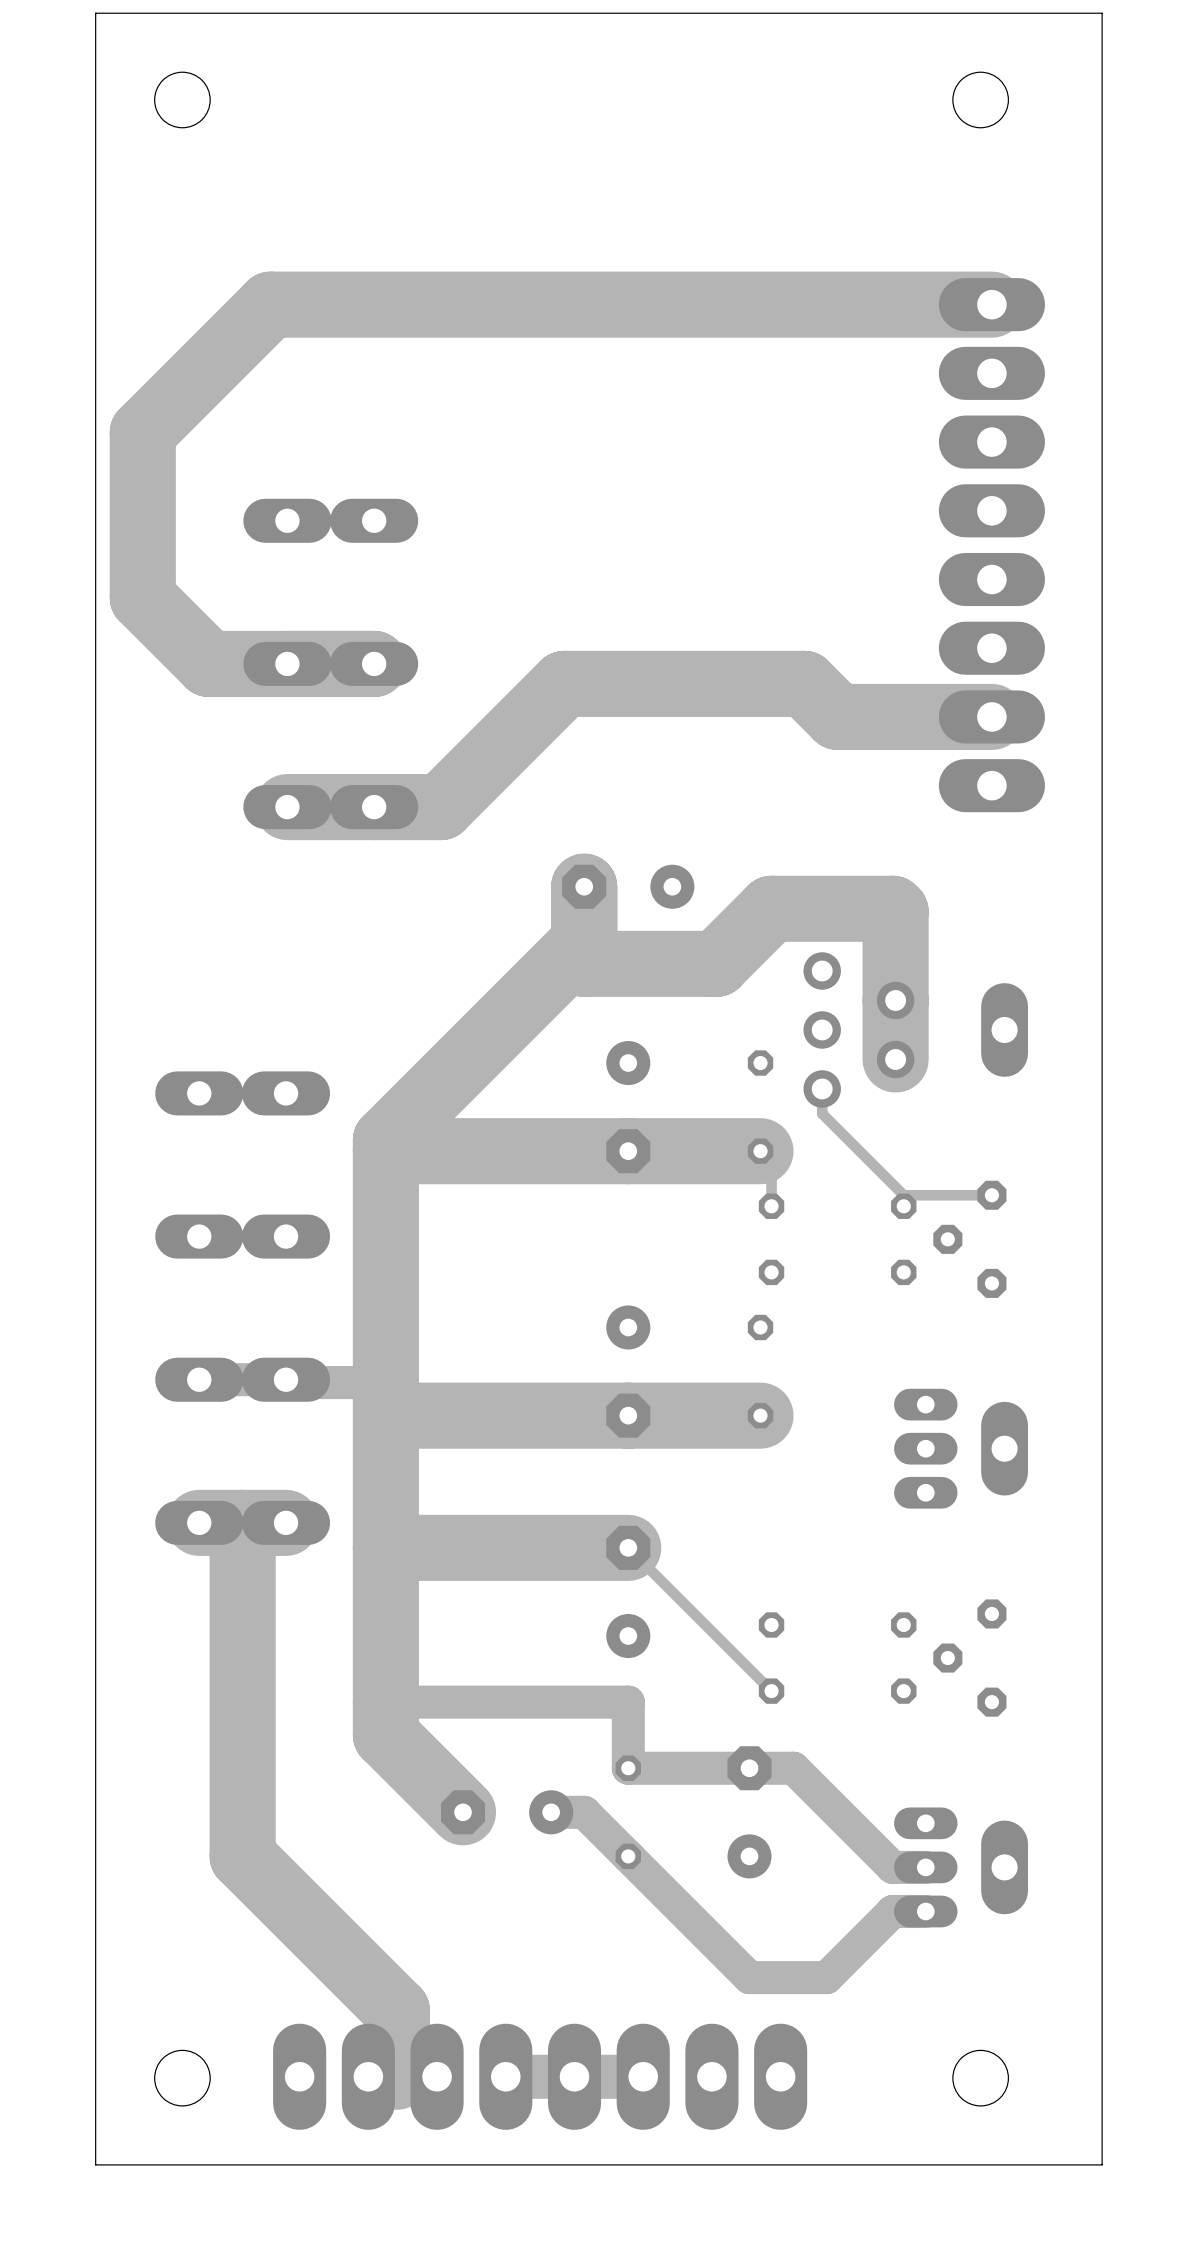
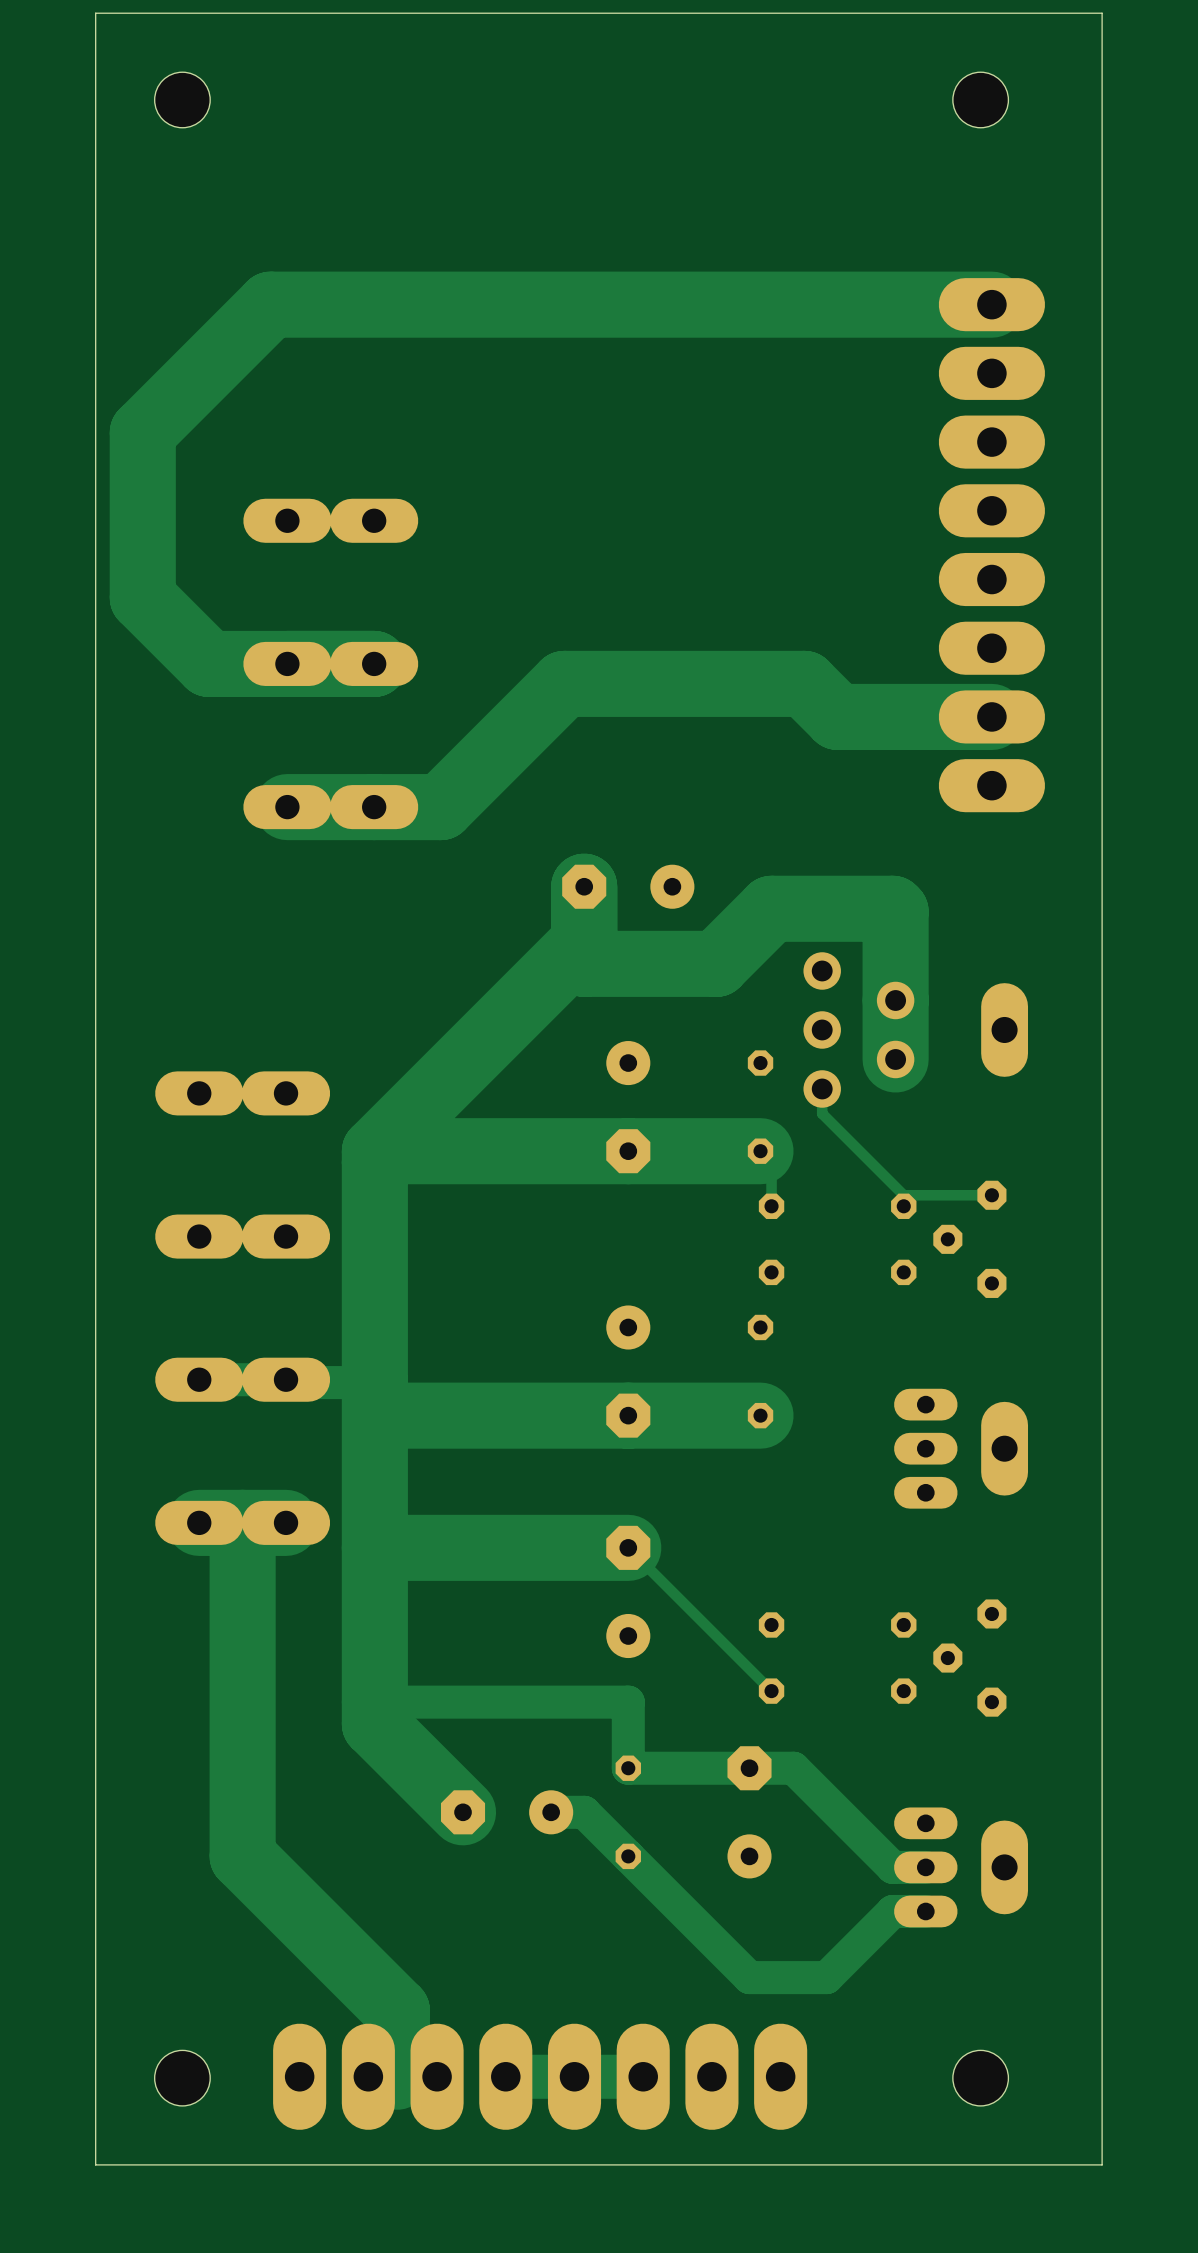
track: (385, 1140) (385, 1382) -> none
track: (385, 1382) (385, 1735) -> (385, 1140) (374, 1151) (374, 1724) (385, 1735)

